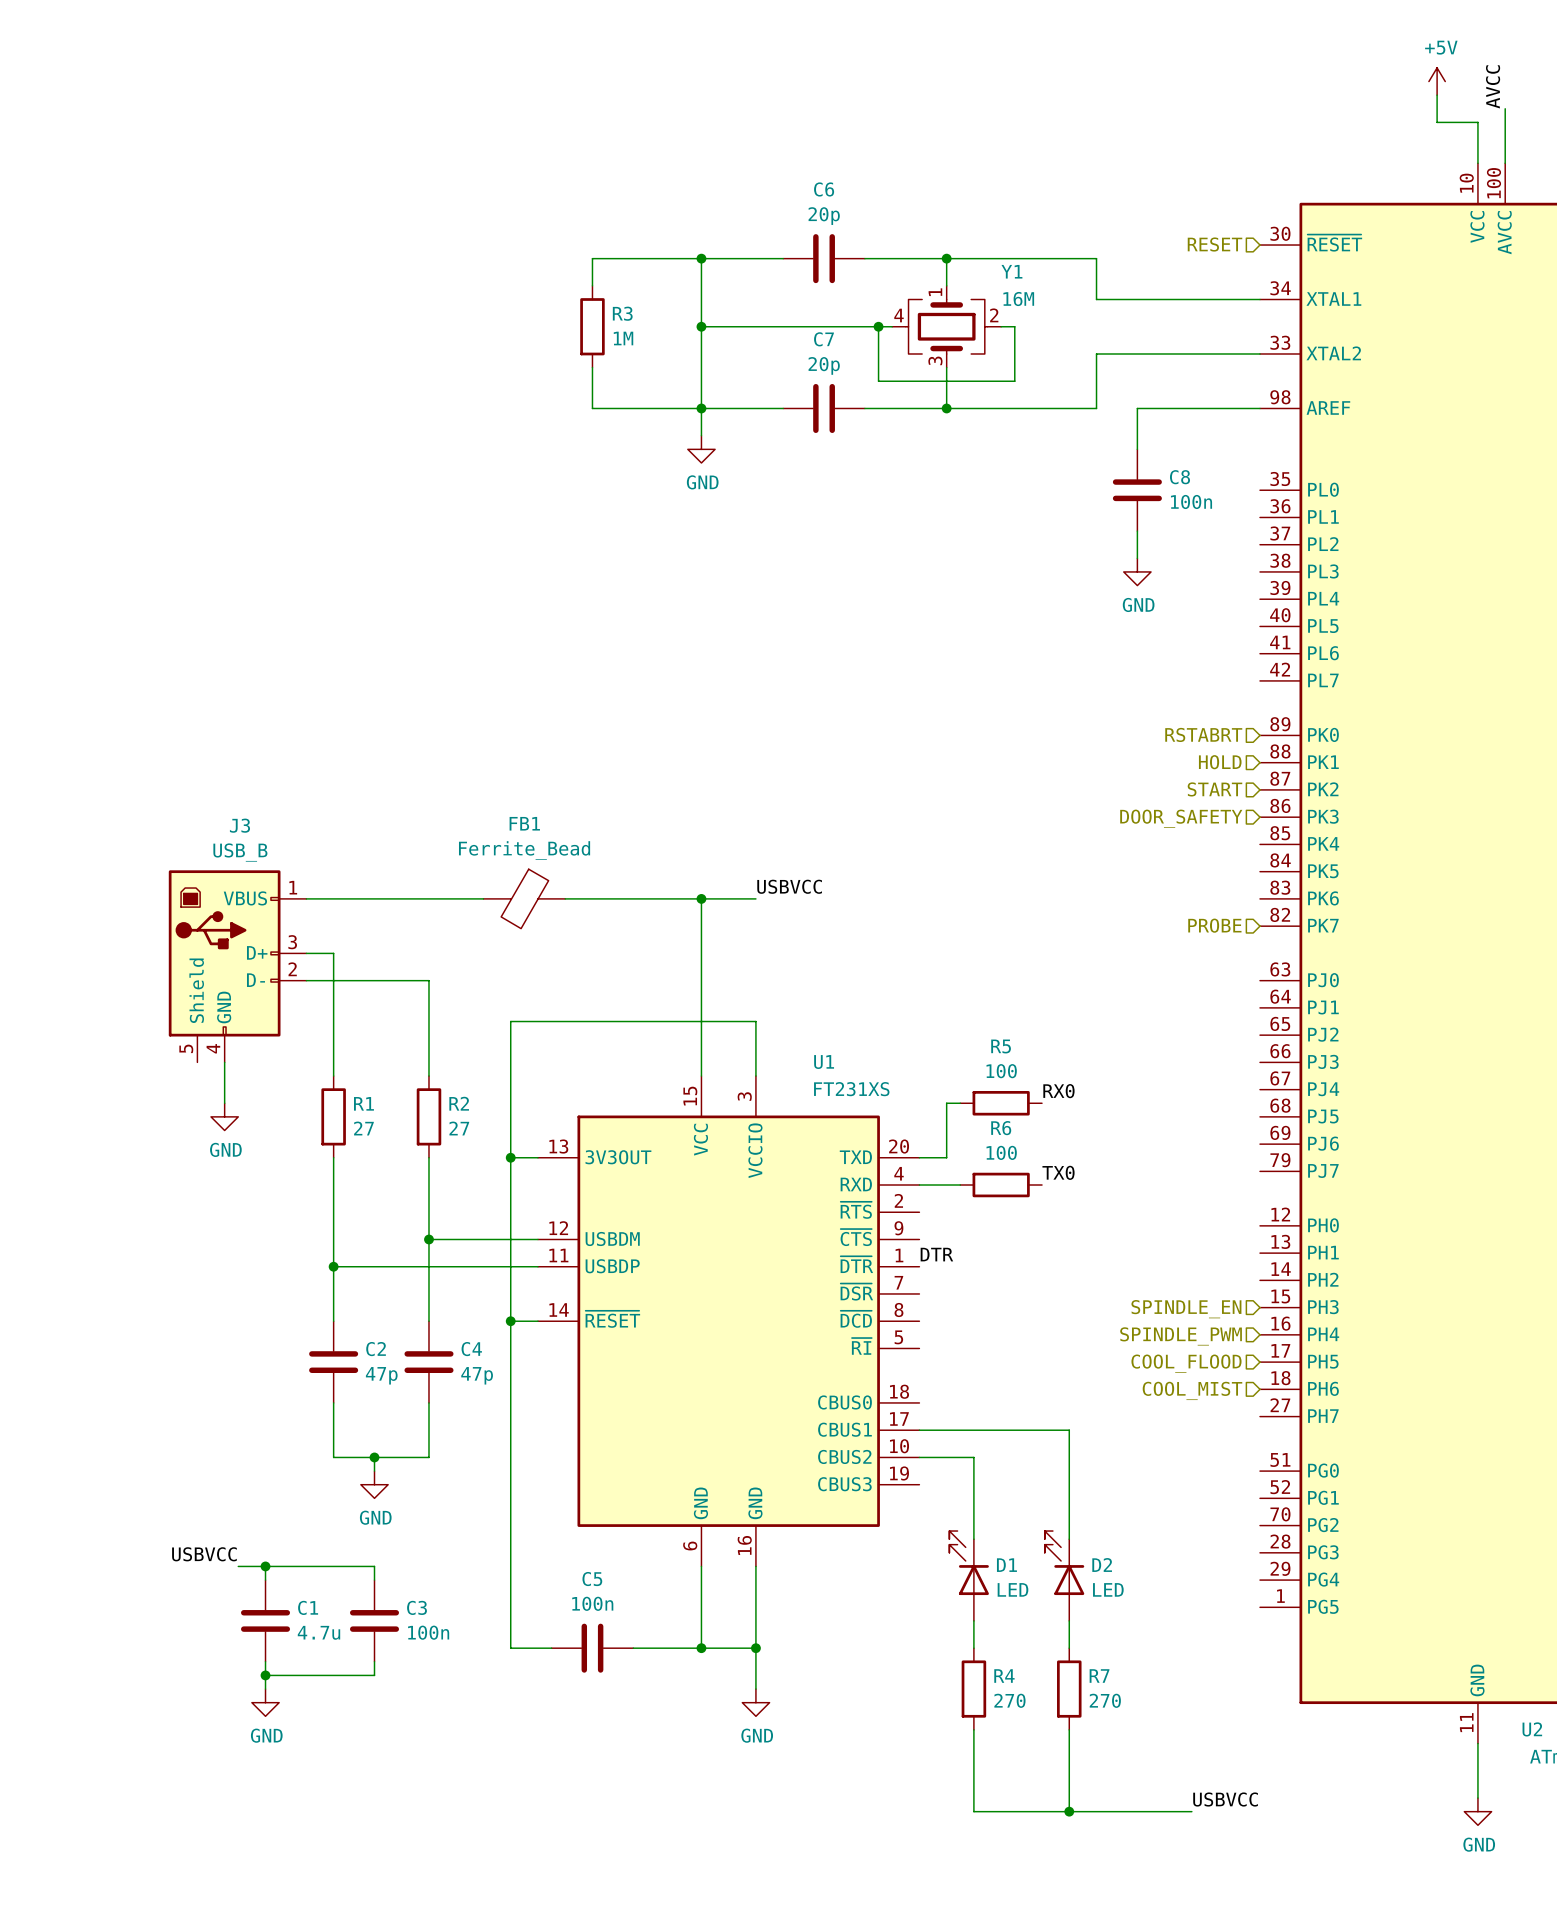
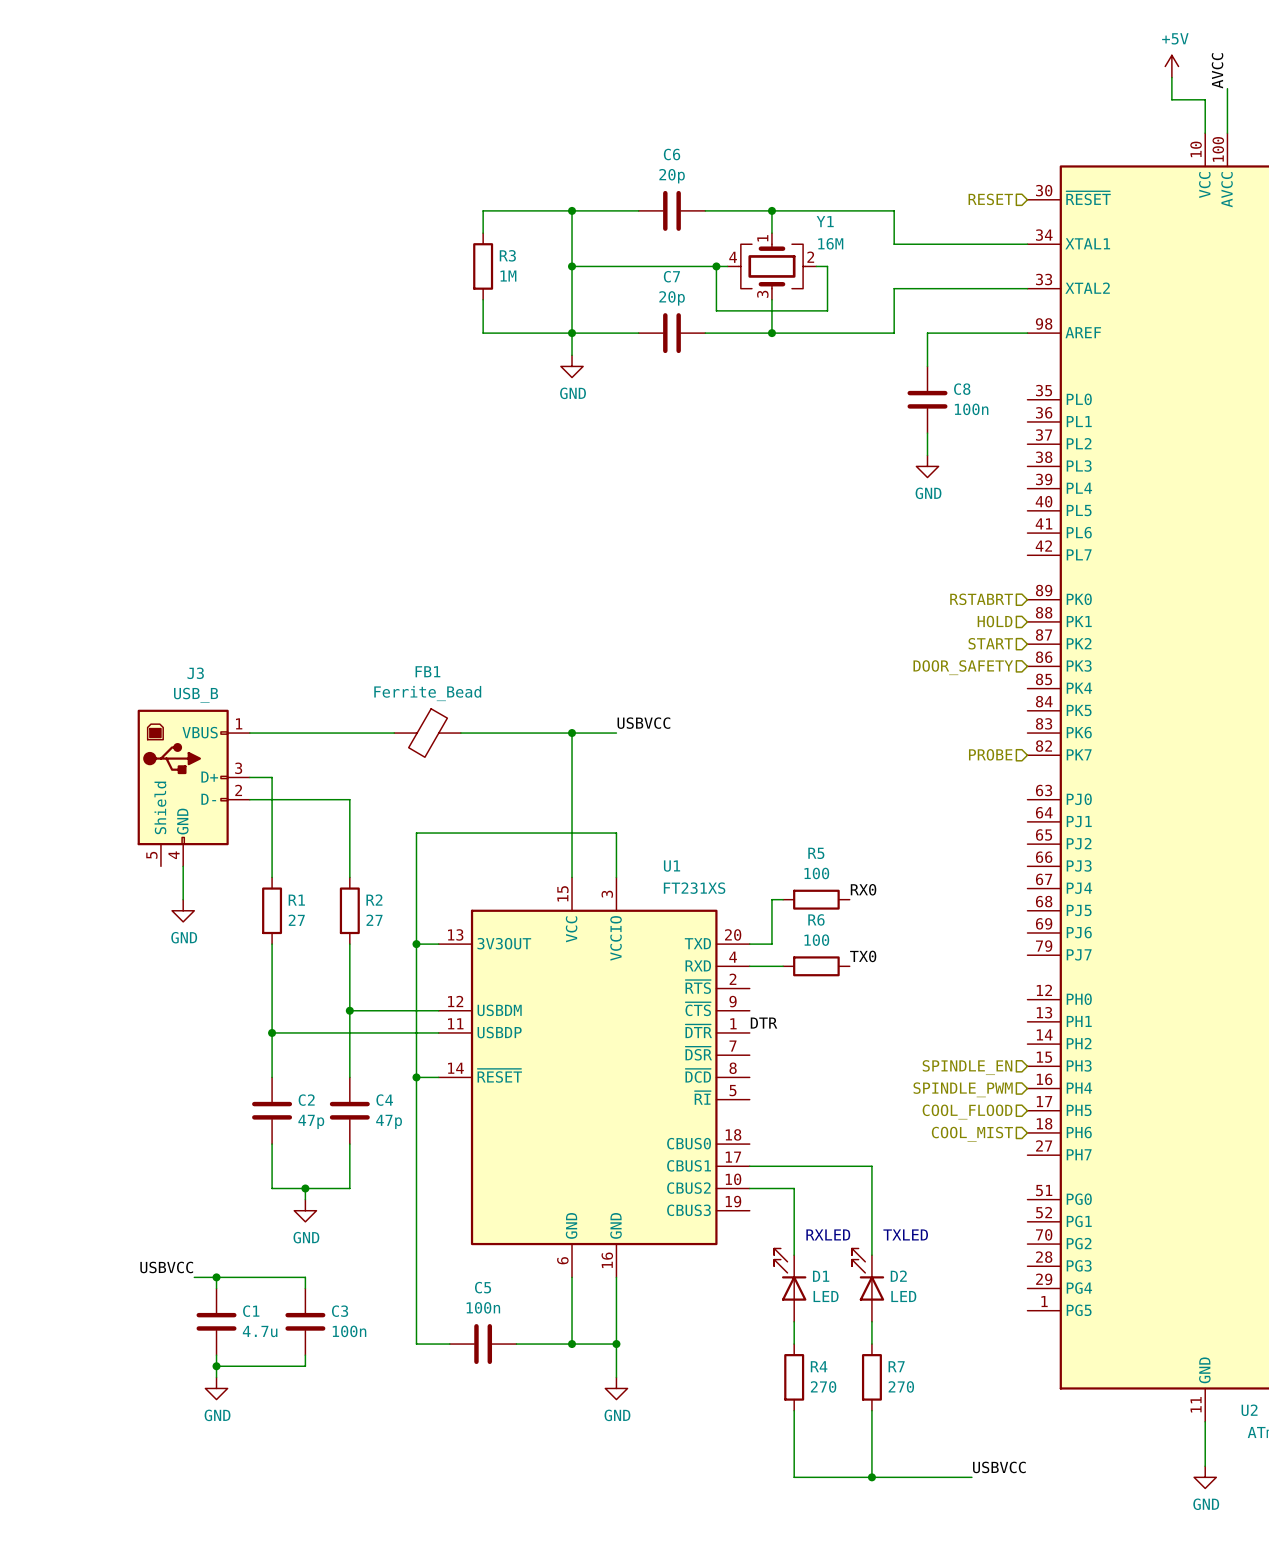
text: none -> RXLED (828, 1234)
text: none -> TXLED (905, 1234)

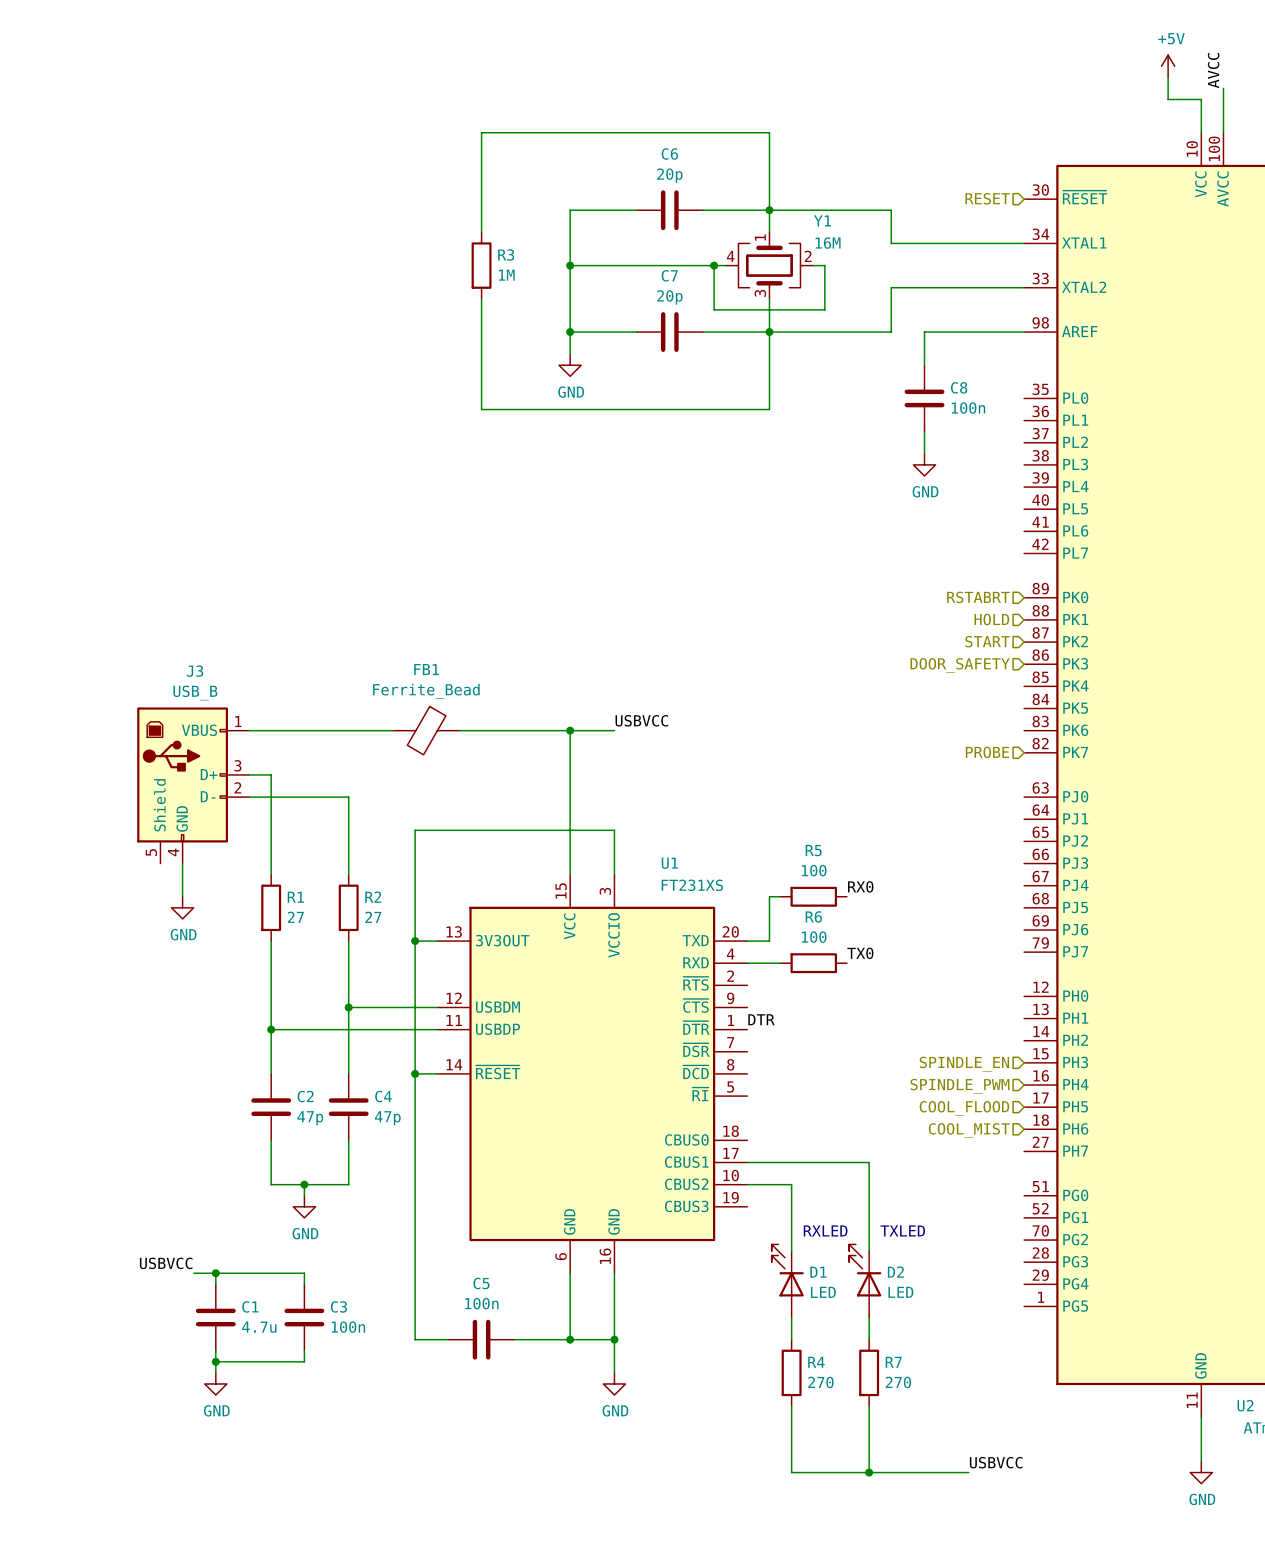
wire: (483, 210) (572, 210) -> (481, 210) (481, 132) (769, 132) (769, 210)
junction: (572, 210) -> none
wire: (483, 333) (572, 333) -> (481, 332) (481, 409) (769, 409) (769, 332)

